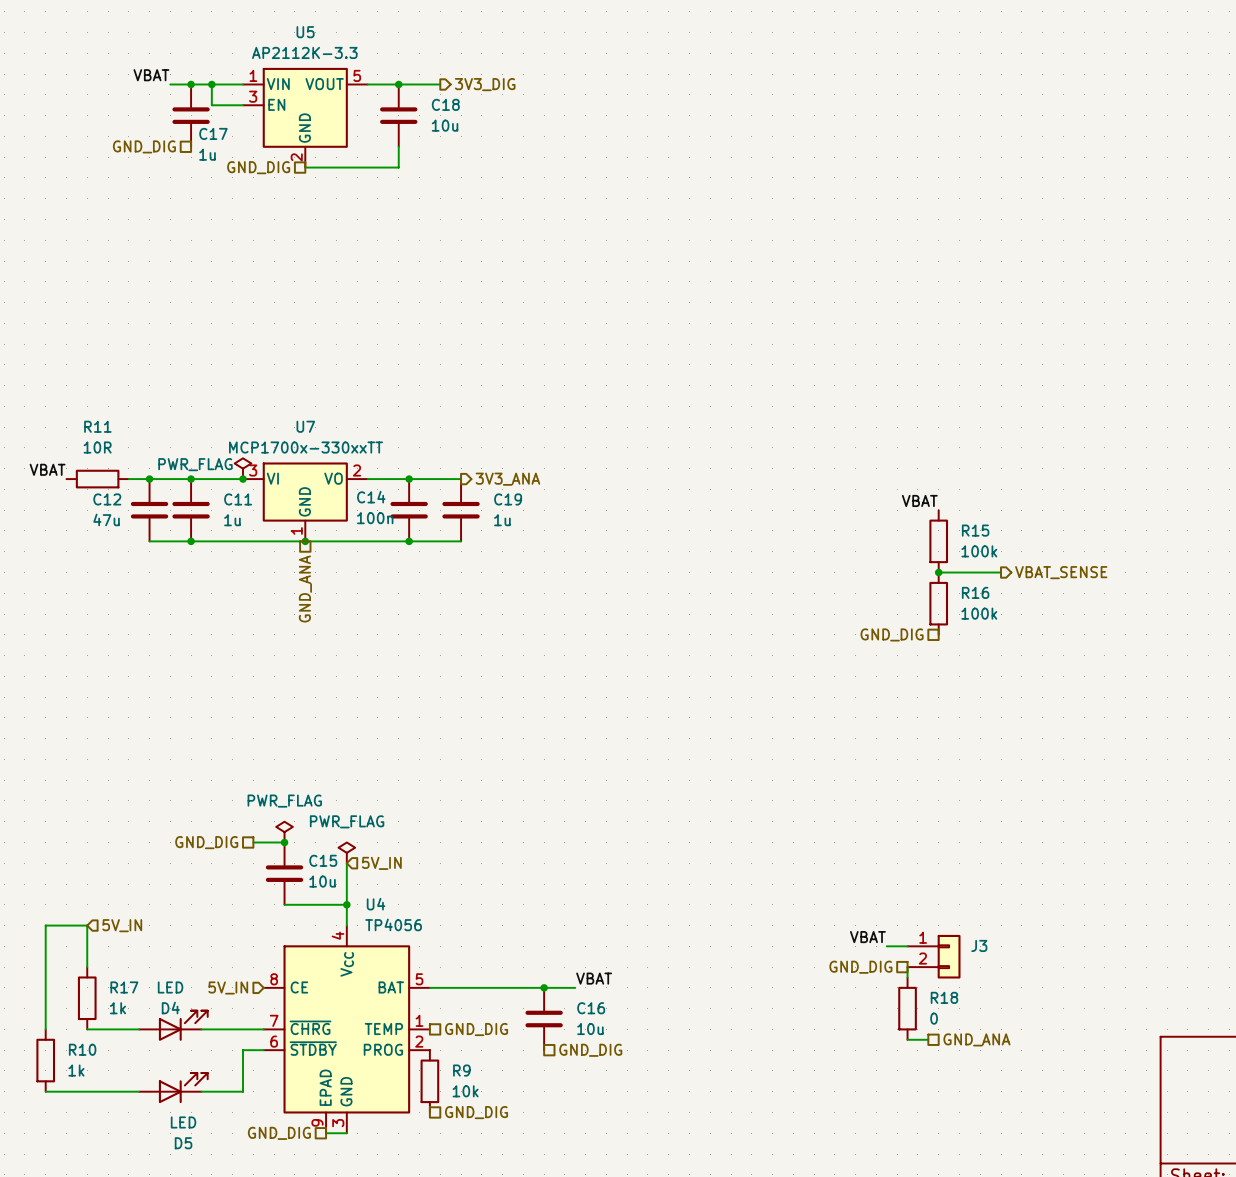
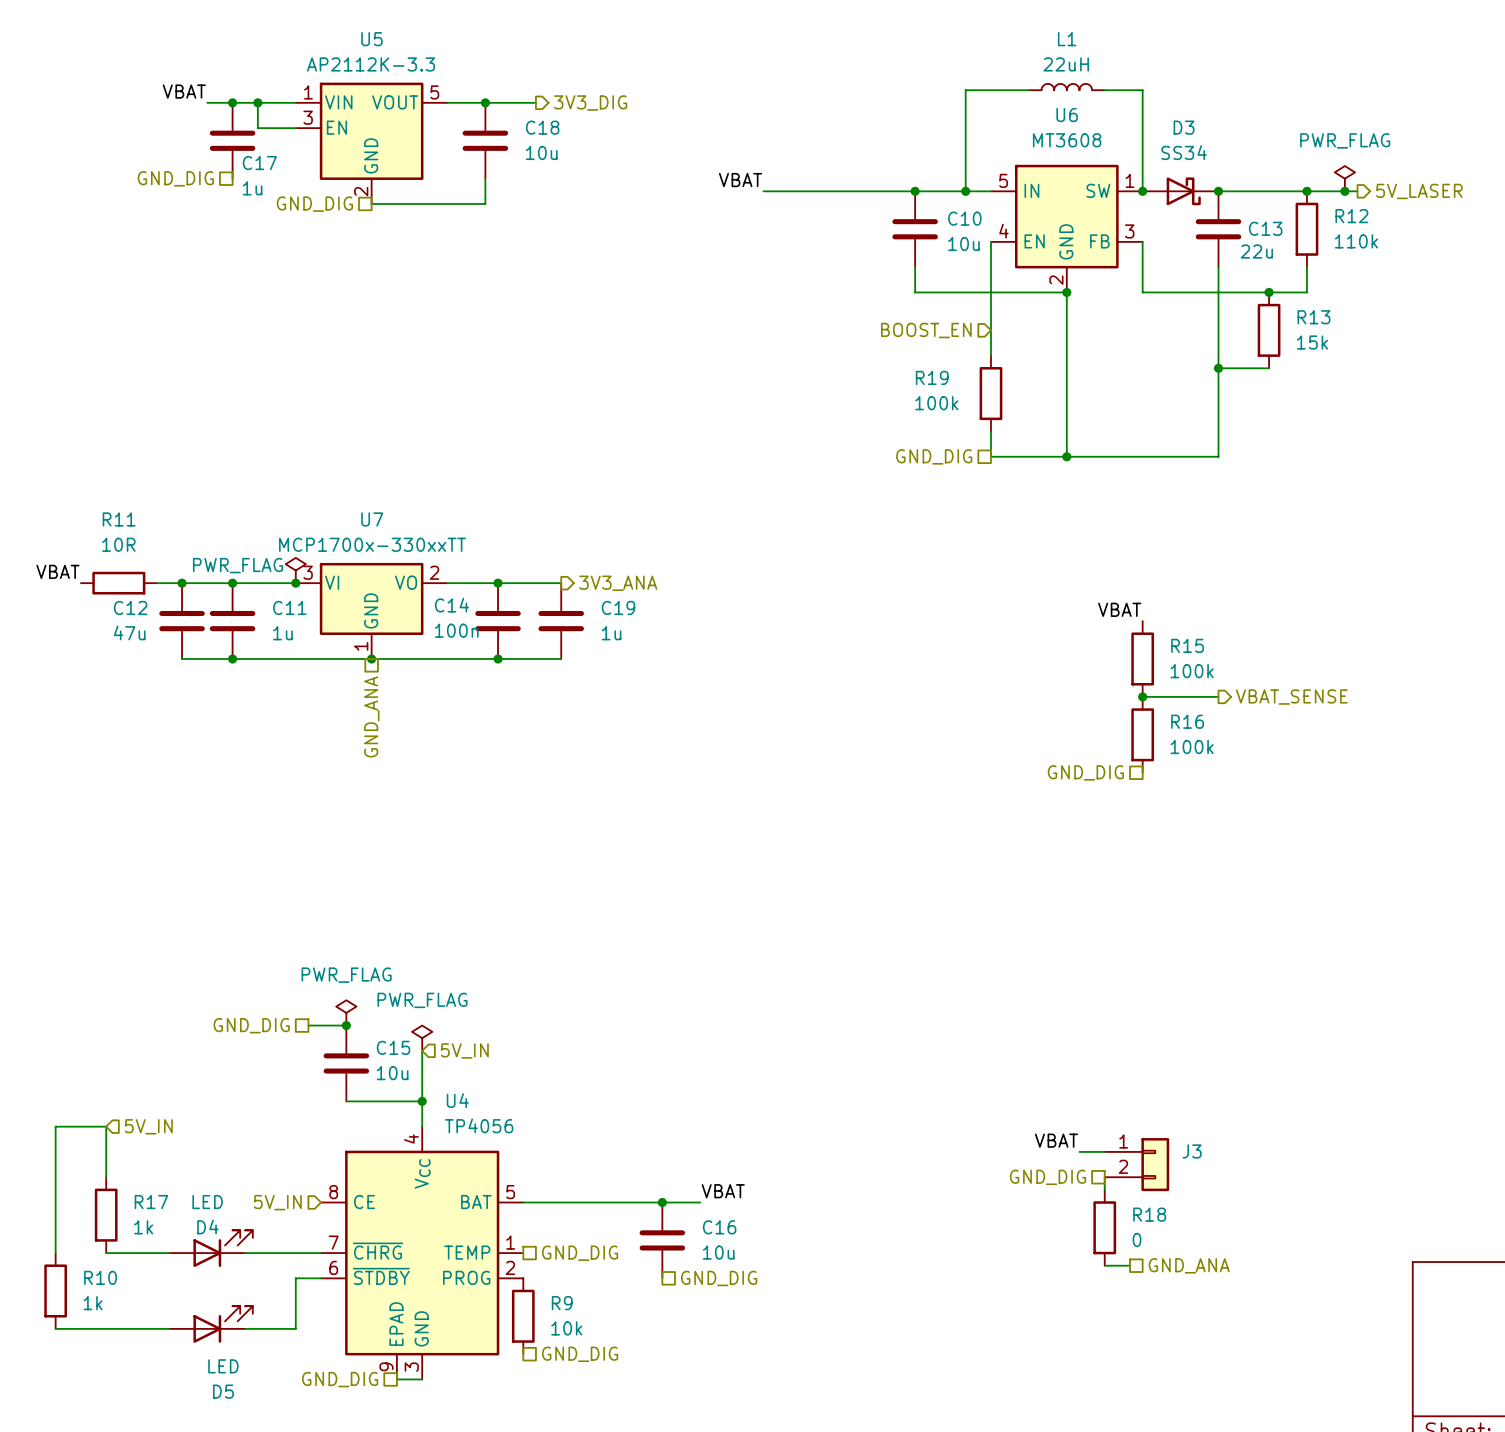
L1: none -> 22uH (1066, 87)
wire: none -> (1028, 90) (965, 90) (965, 191)
wire: none -> (1104, 90) (1142, 90) (1142, 191)
power symbol: none -> PWR_FLAG (1344, 178)
label: none -> VBAT (740, 180)
wire: none -> (763, 191) (990, 191)
junction: none -> (915, 191)
junction: none -> (965, 191)
junction: none -> (1142, 191)
D3: none -> SS34 (1180, 191)
wire: none -> (1218, 191) (1357, 191)
junction: none -> (1218, 191)
junction: none -> (1306, 191)
junction: none -> (1344, 191)
hierarchical label: none -> 5V_LASER (1419, 191)
U6: none -> MT3608 (1066, 228)
C10: none -> 10u (915, 229)
C13: none -> 22u (1218, 229)
R12: none -> 110k (1306, 229)
wire: none -> (990, 241) (990, 355)
wire: none -> (1142, 241) (1142, 292) (1306, 292) (1306, 267)
wire: none -> (915, 267) (915, 292) (1066, 292) (1066, 456)
wire: none -> (1218, 267) (1218, 456) (990, 456) (990, 431)
junction: none -> (1066, 292)
junction: none -> (1269, 292)
hierarchical label: none -> BOOST_EN (926, 330)
R13: none -> 15k (1269, 330)
wire: none -> (1218, 368) (1269, 368)
junction: none -> (1218, 368)
R19: none -> 100k (990, 393)
hierarchical label: none -> GND_DIG (934, 456)
junction: none -> (1066, 456)

